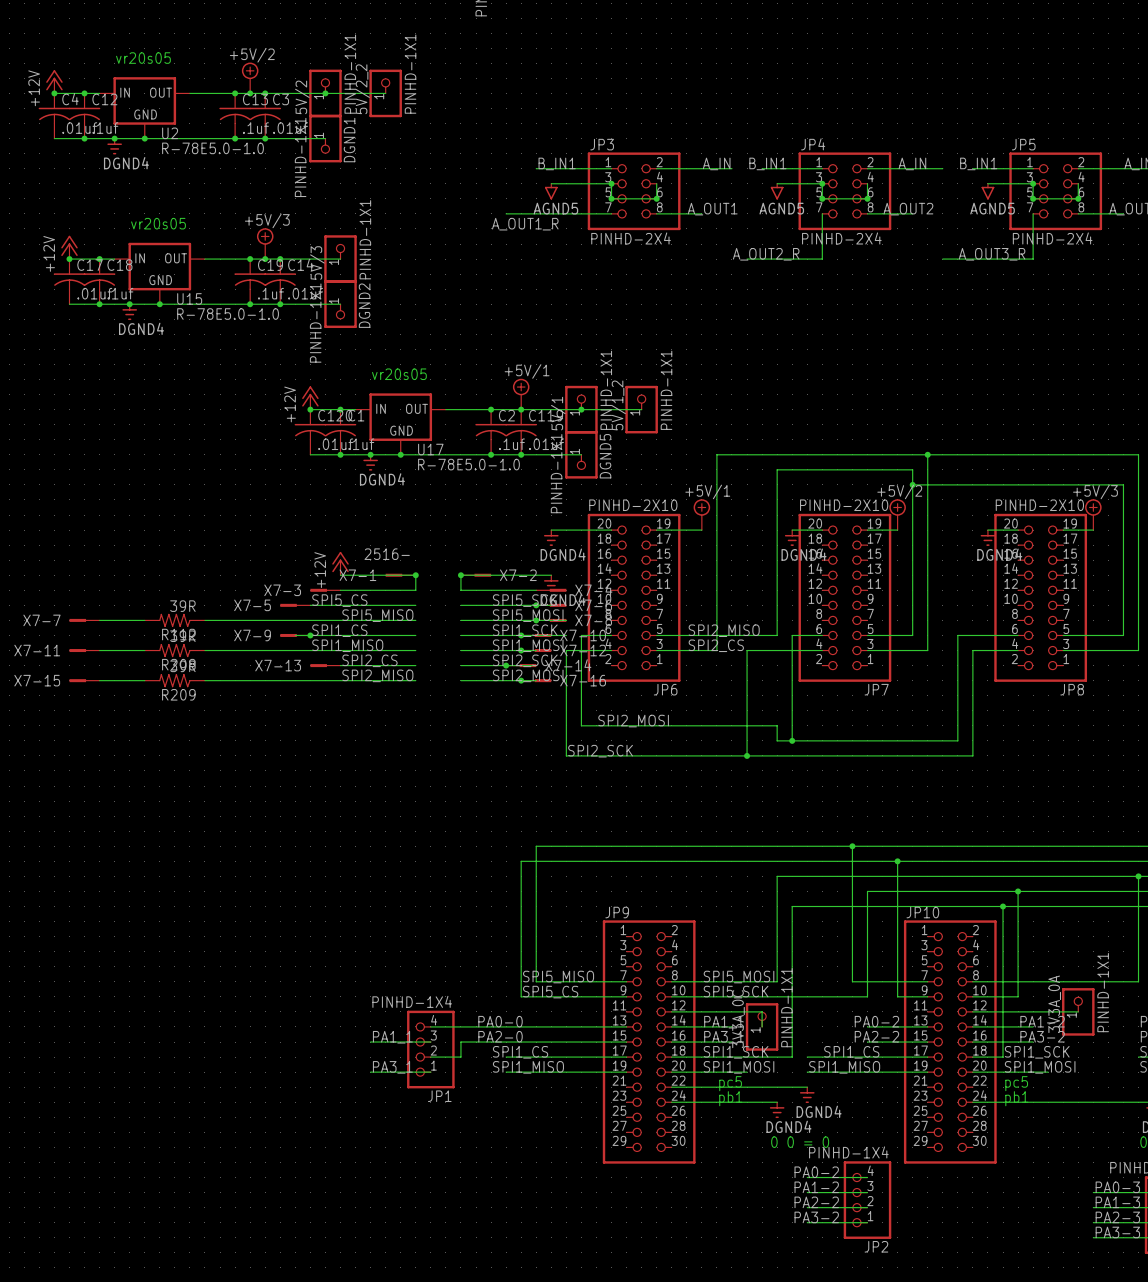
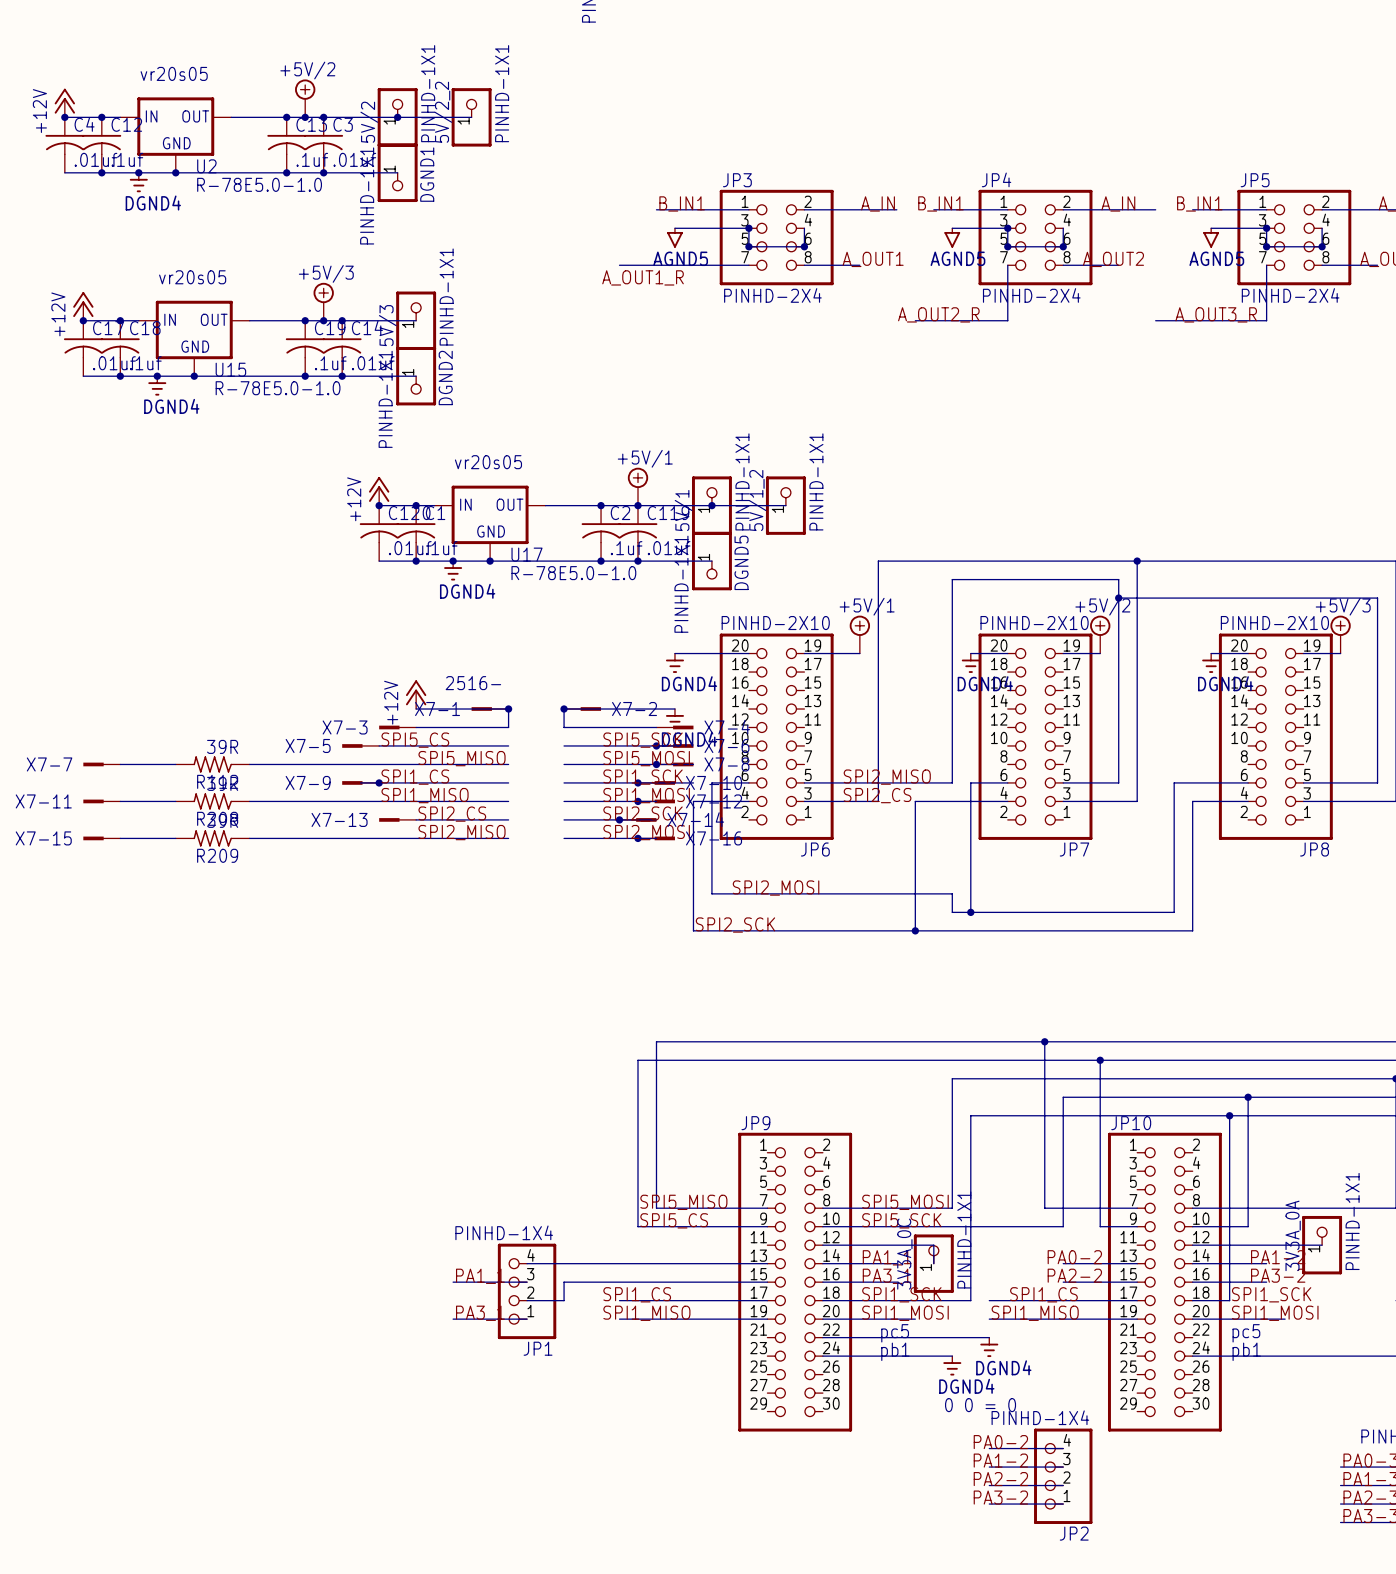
label: PA0-0 (500, 1021) -> none
label: PA2-0 (500, 1036) -> none

